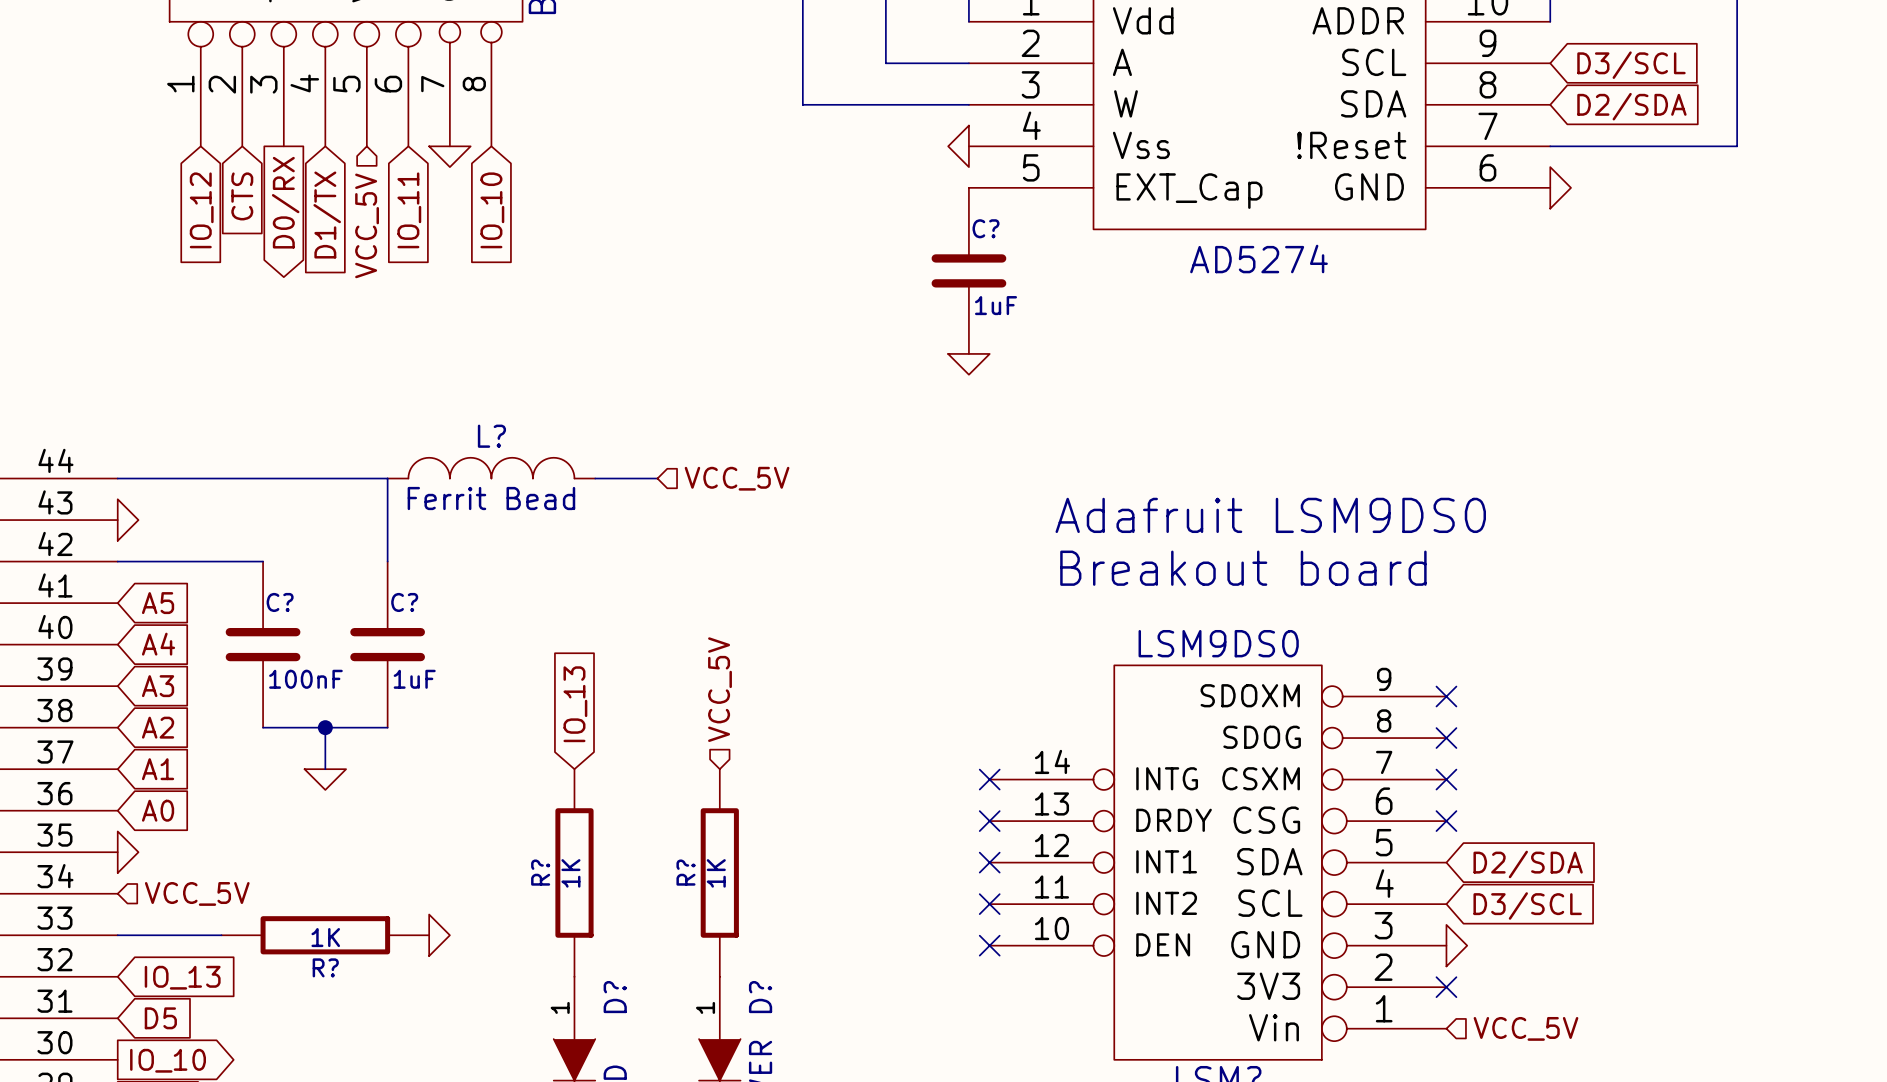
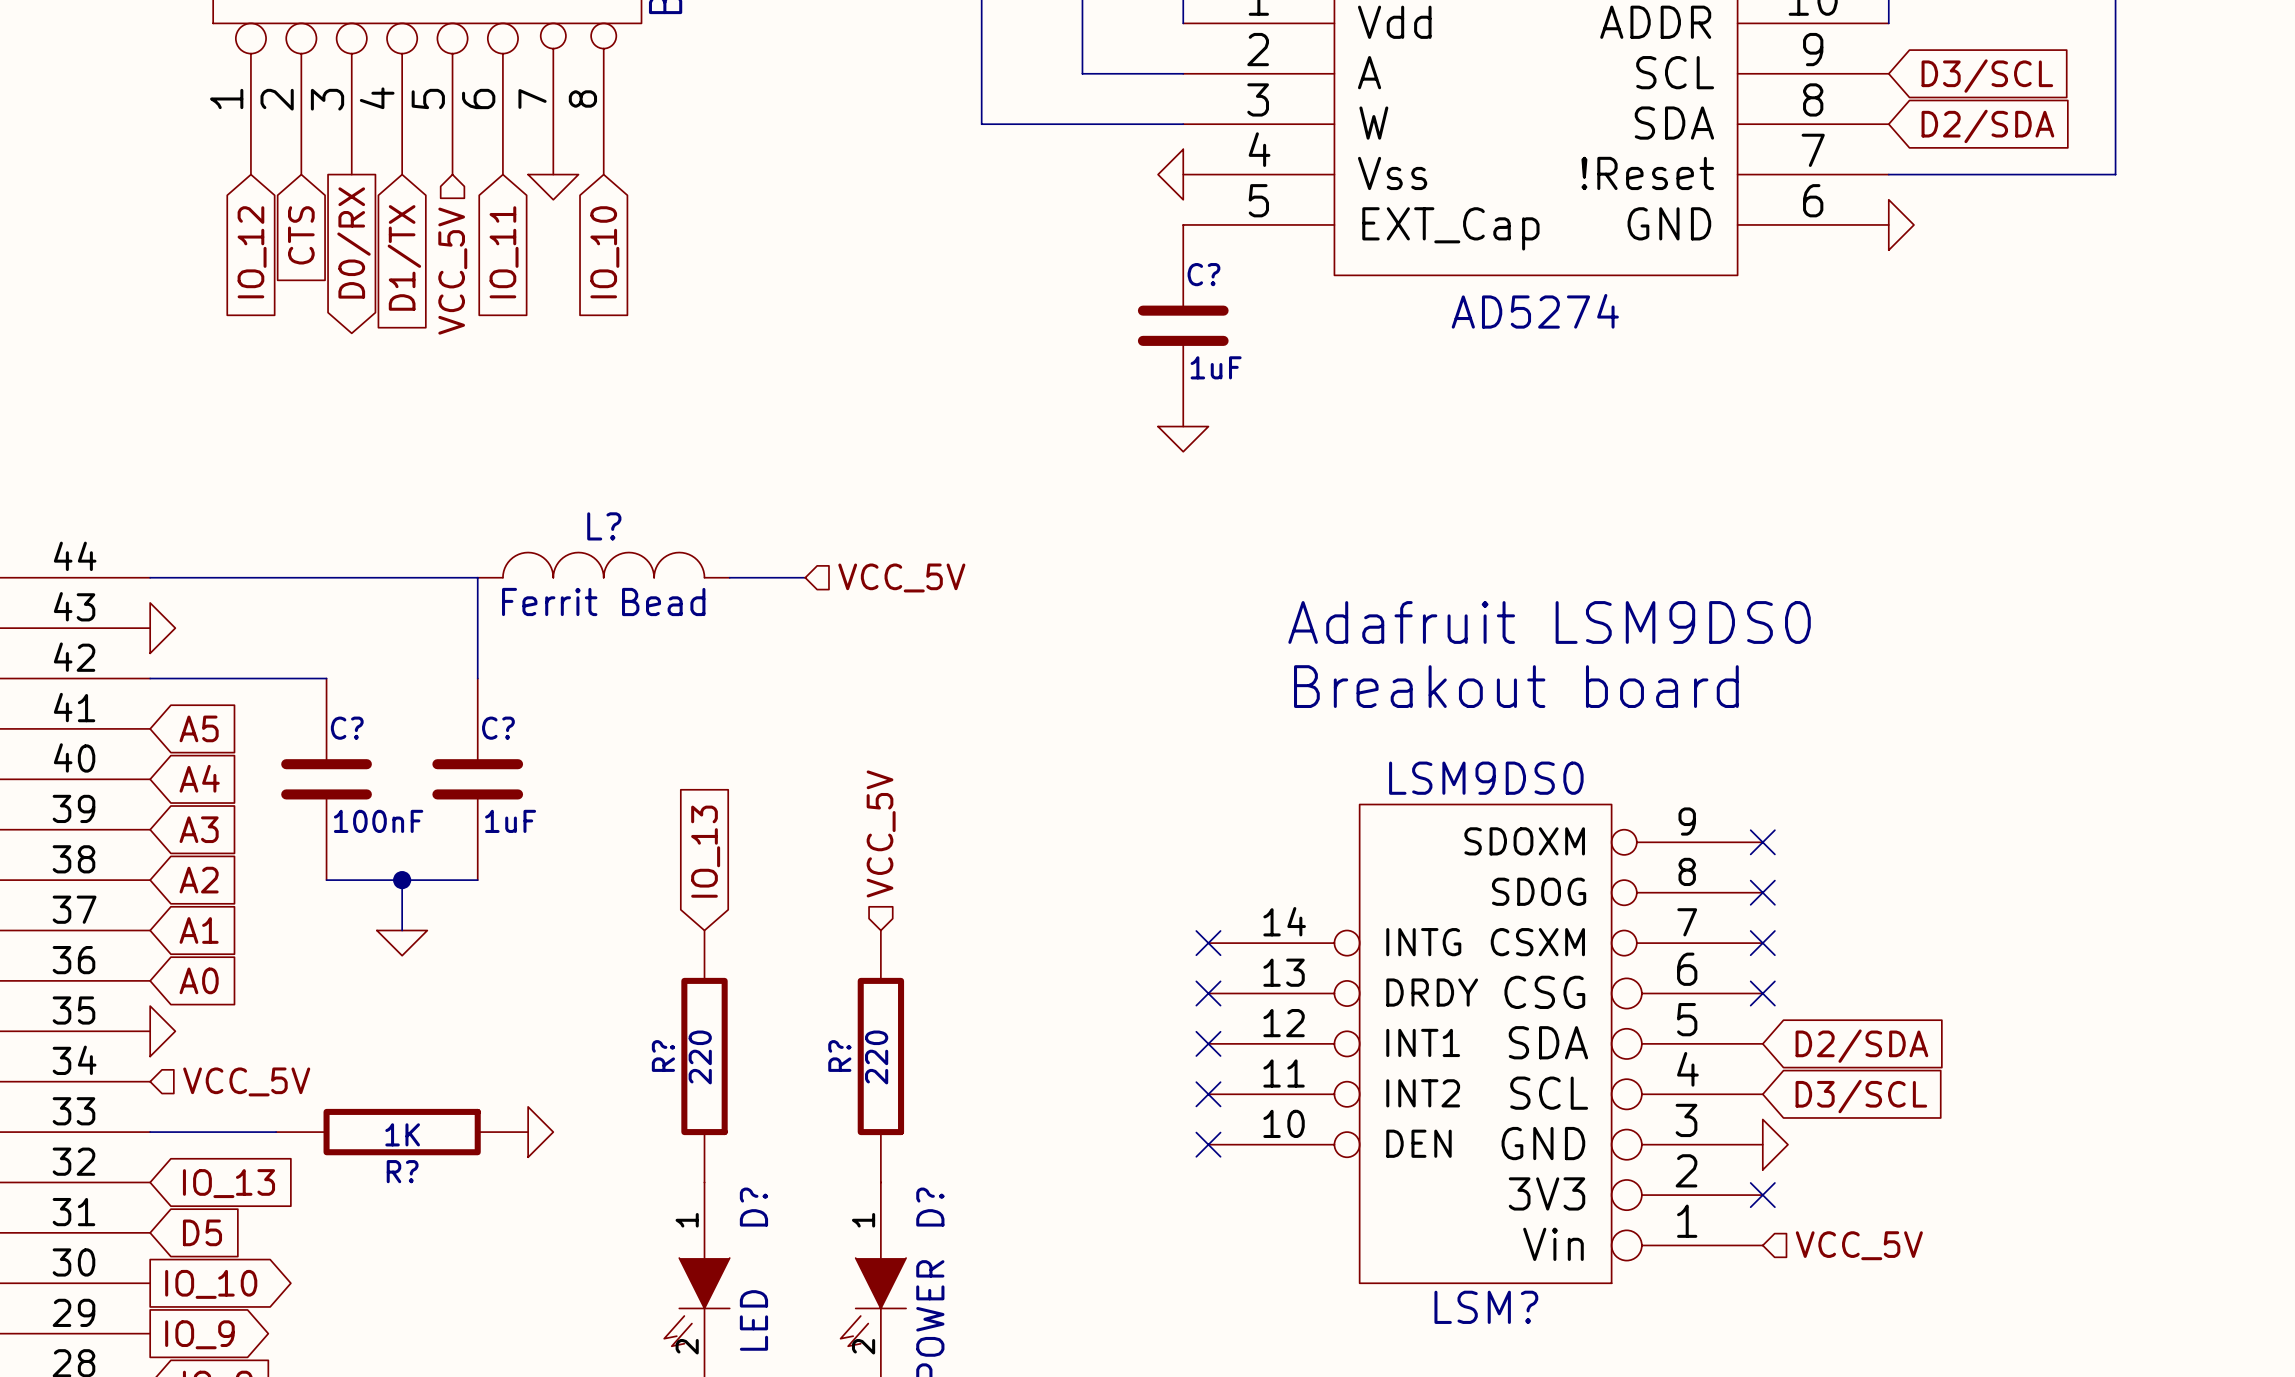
R? value: 1K (570, 873) -> 220 (700, 1057)
R? value: 1K (716, 873) -> 220 (876, 1057)

